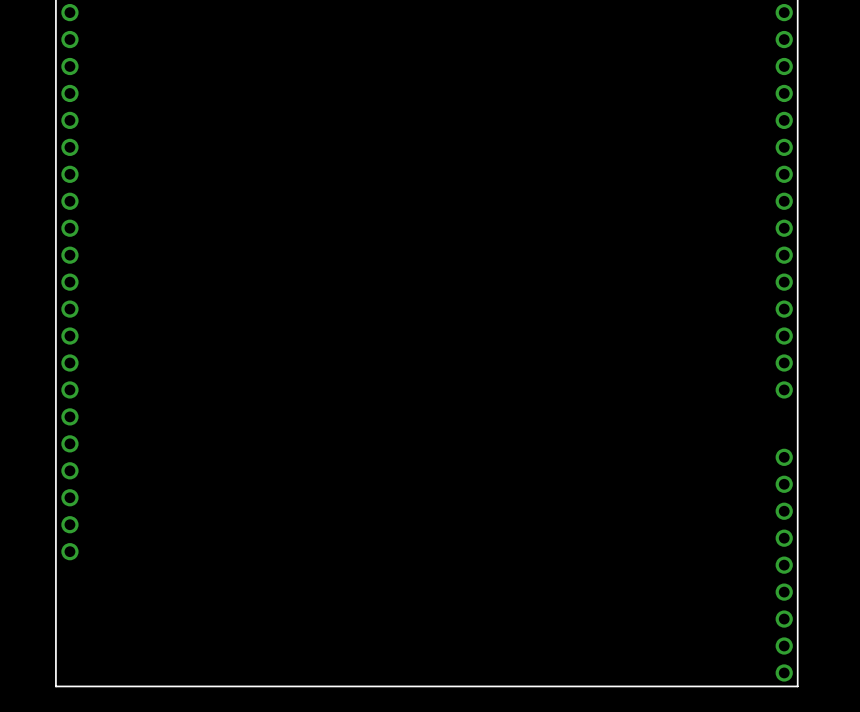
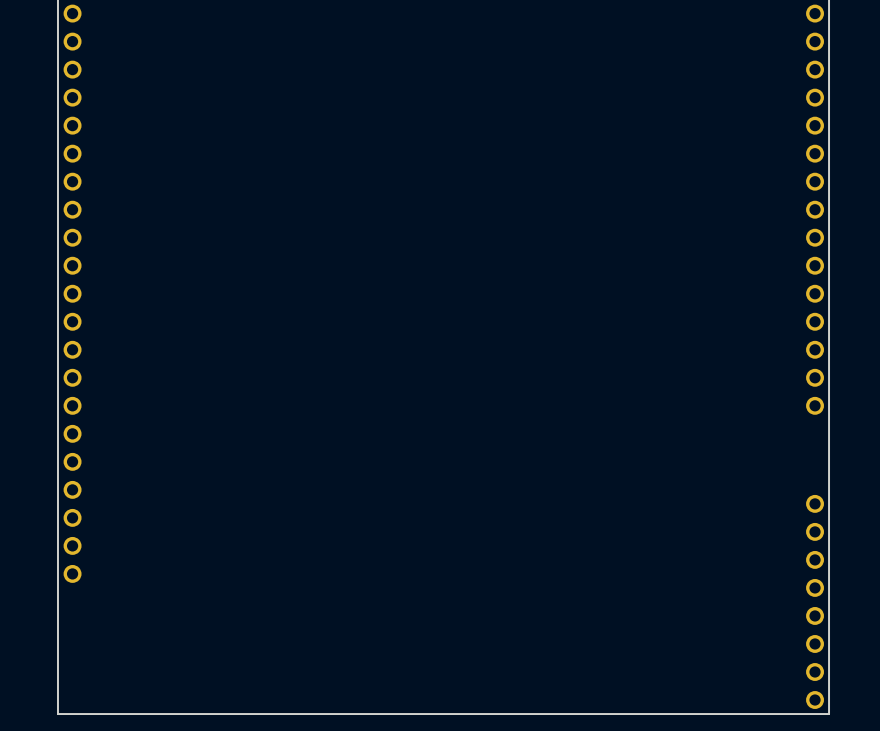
part: (784, 457) -> none

